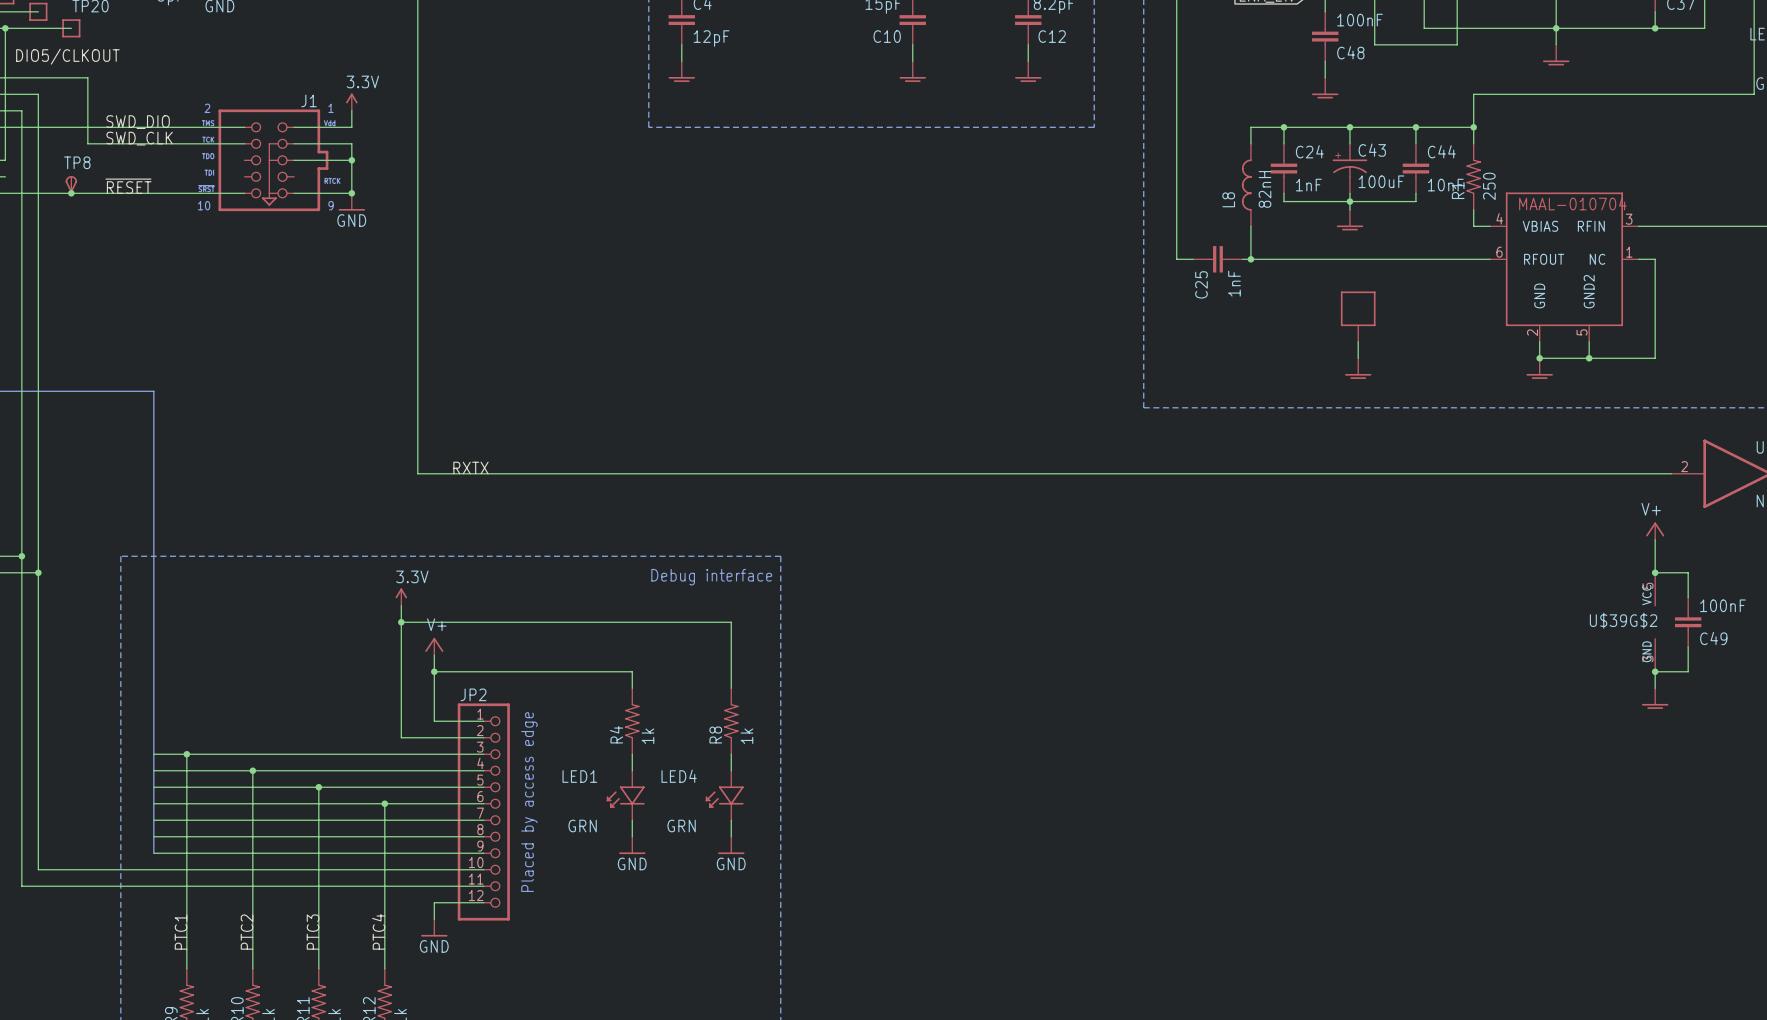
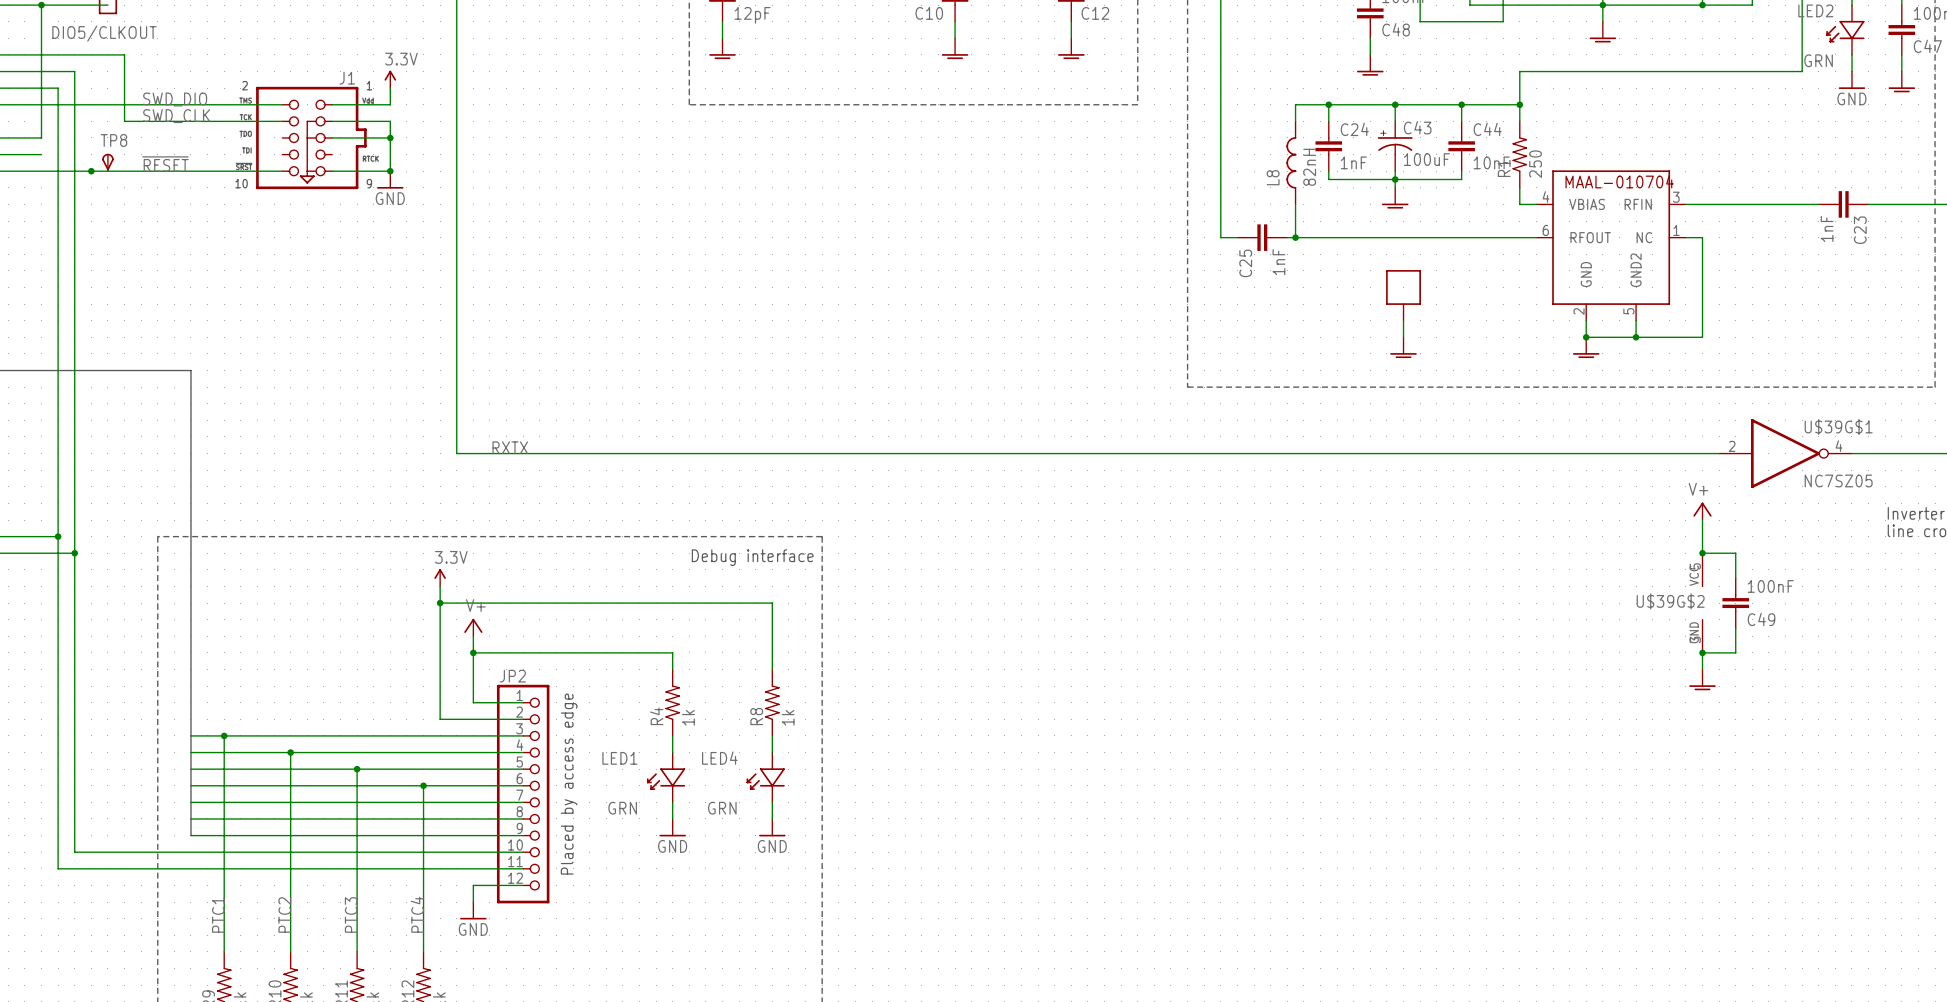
junction position: (71, 193) -> (91, 171)

